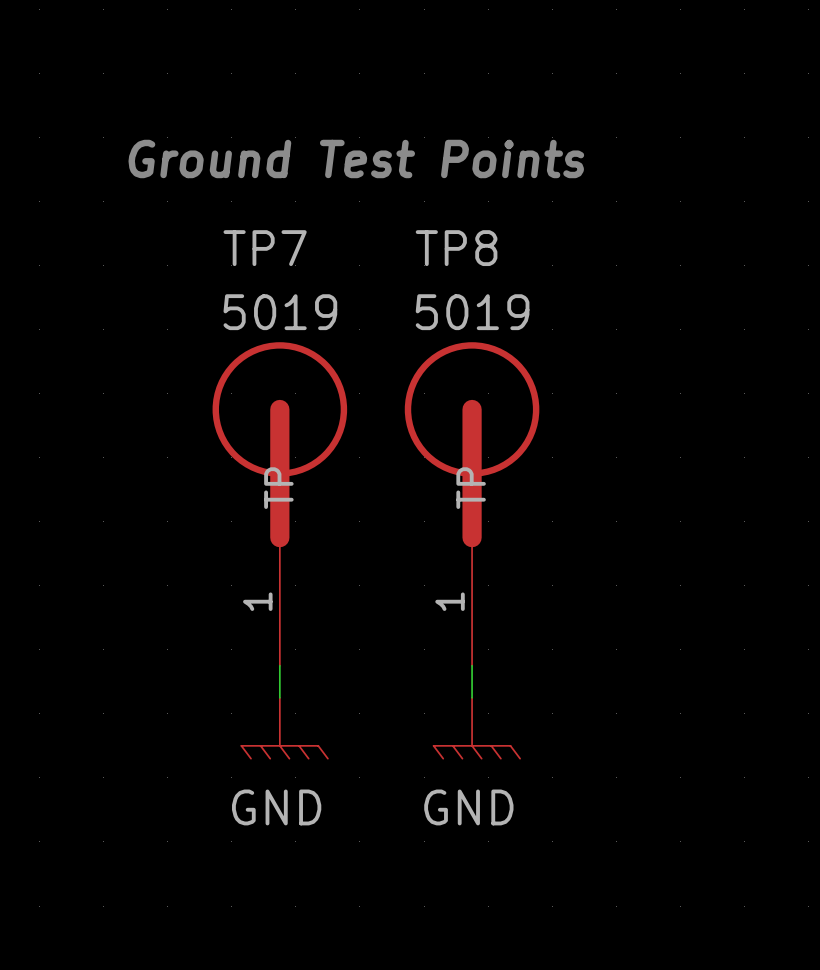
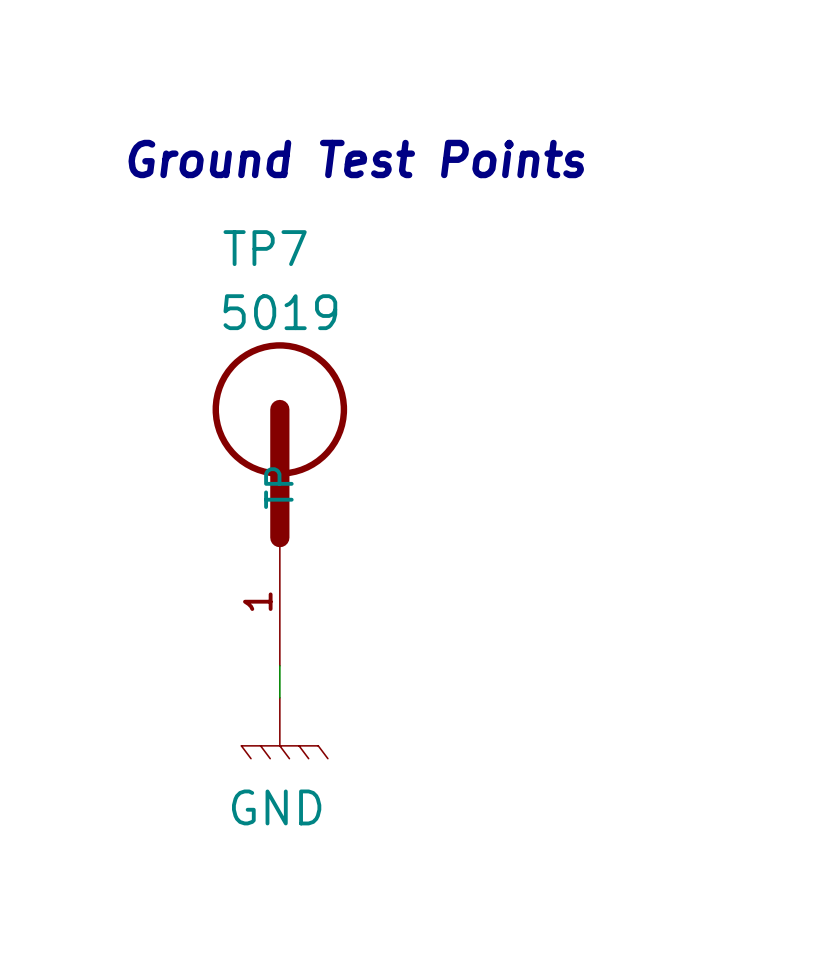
TP8: (472, 503) -> none
wire: (472, 665) (472, 697) -> none
power symbol: GND (476, 728) -> none

